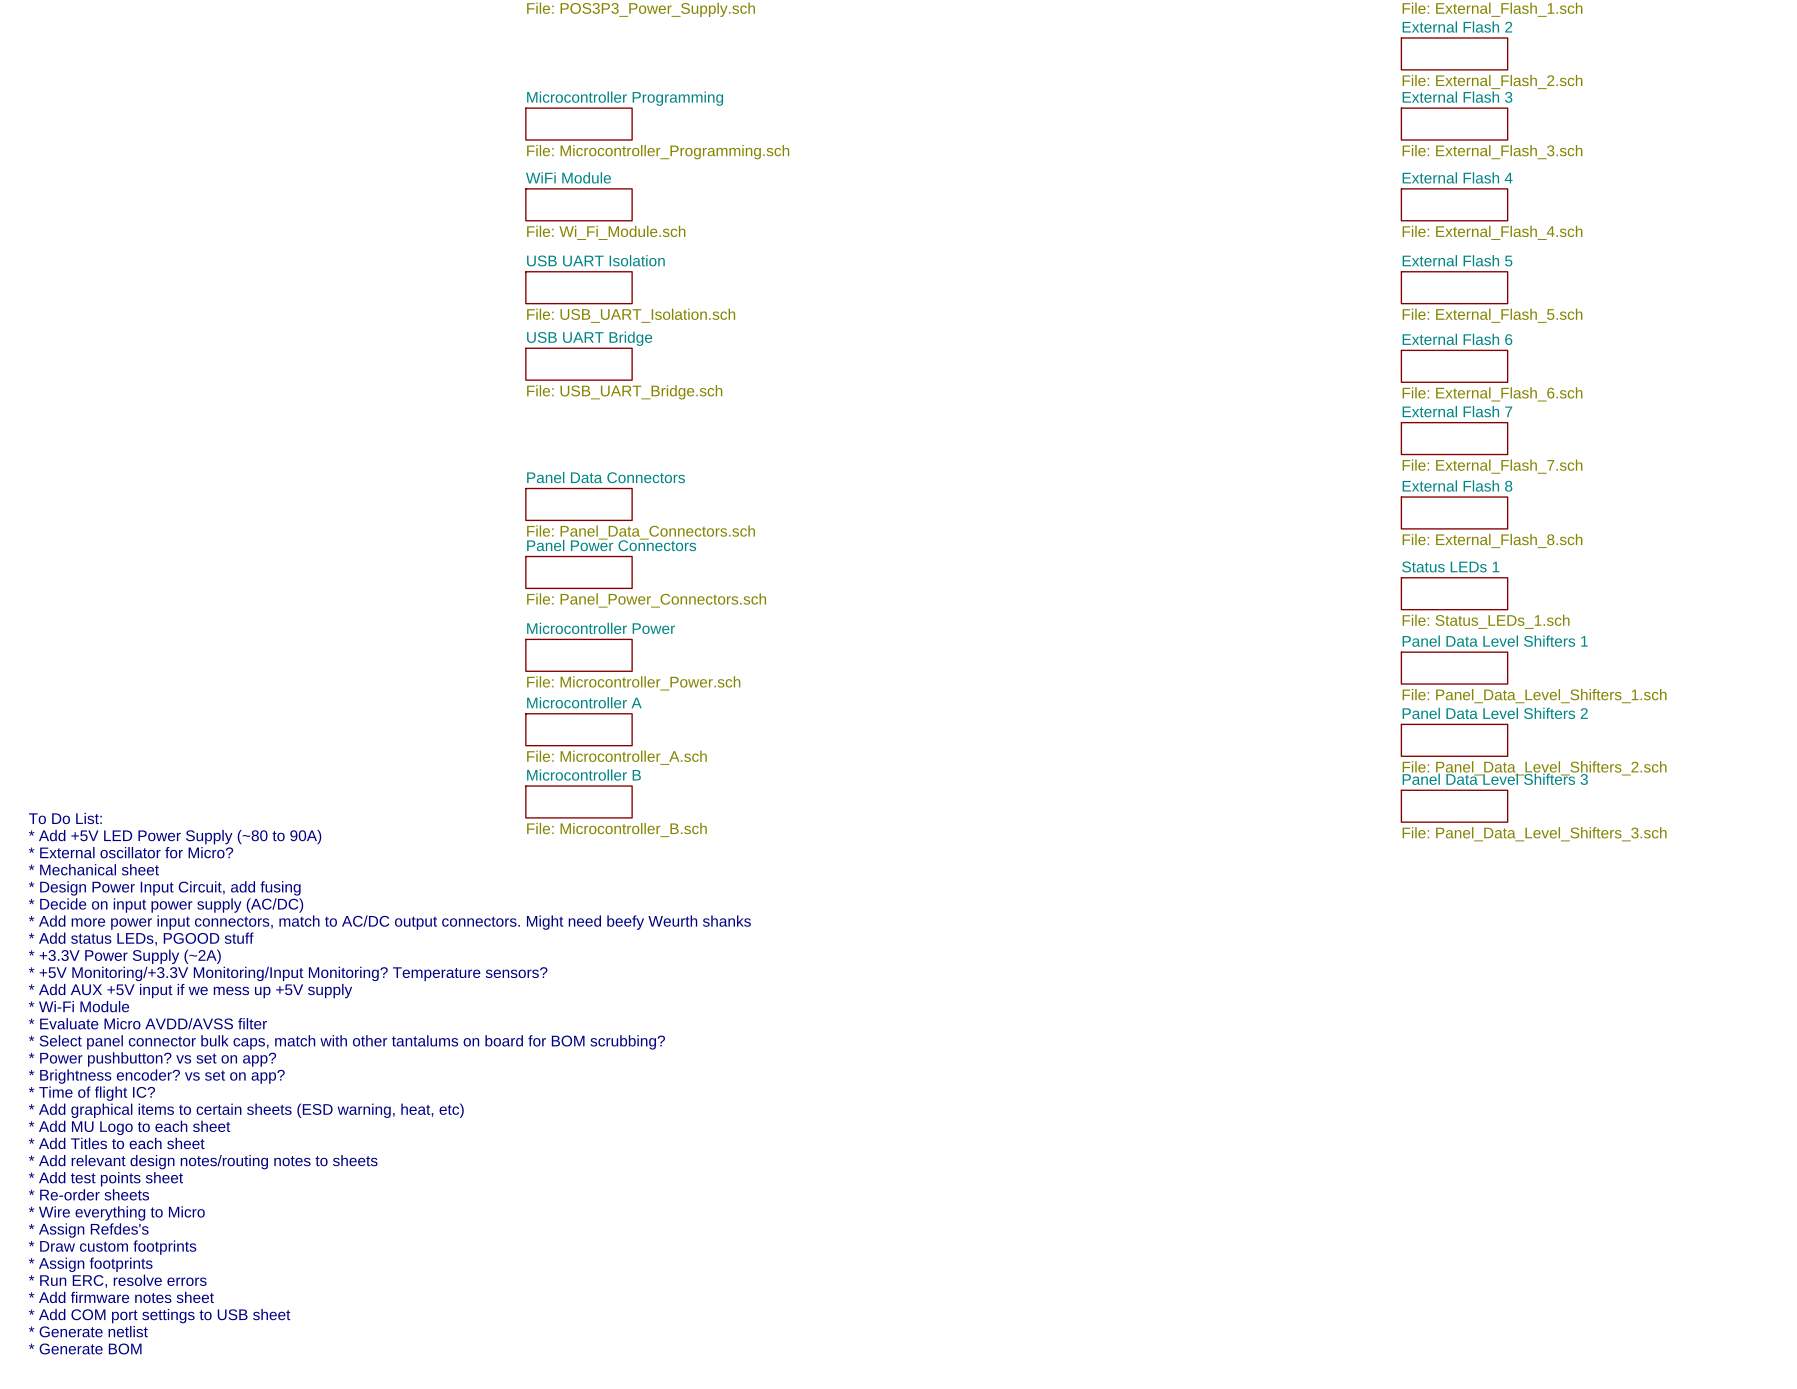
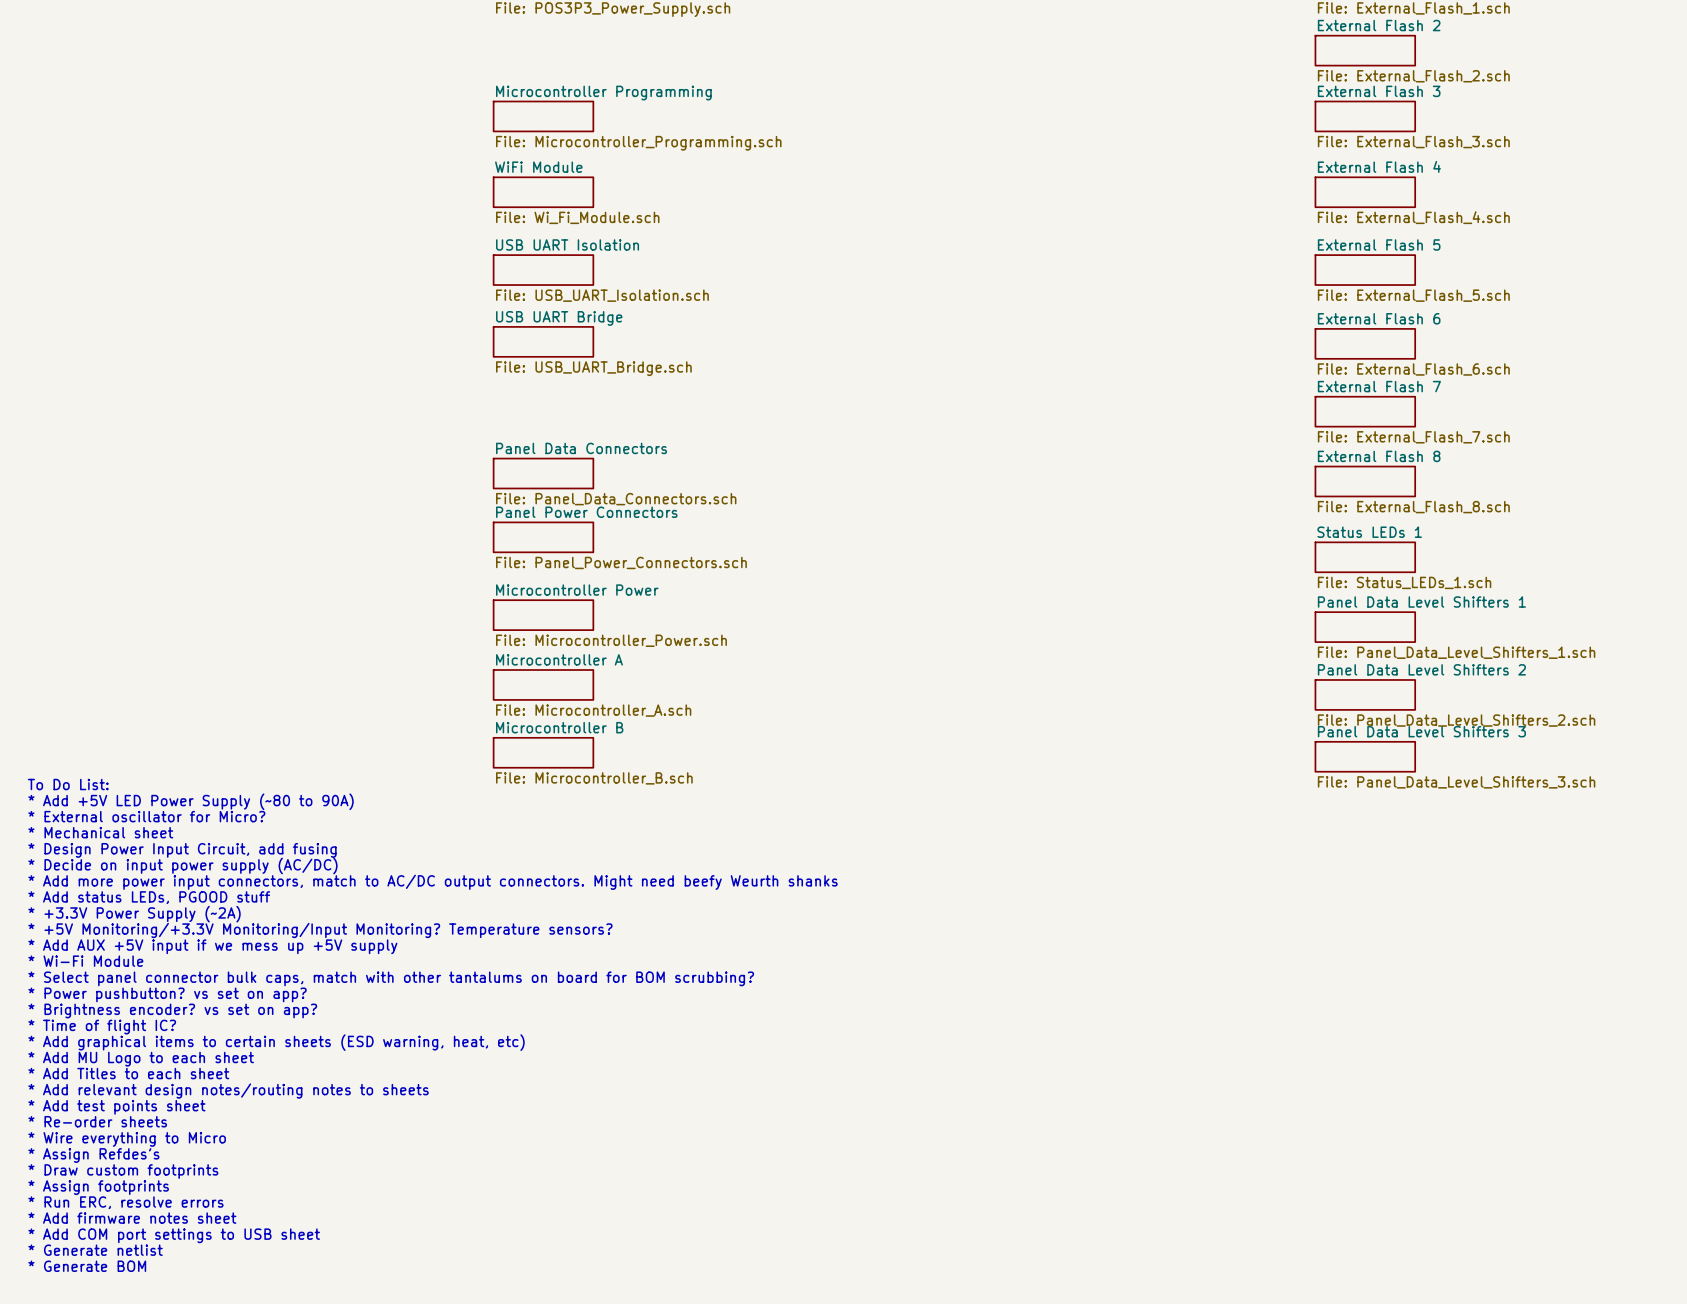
text: To Do List: (65, 818) -> none
text: * Add +5V LED Power Supply (~80 to 90A) (175, 837) -> To Do List: (68, 784)
text: * External oscillator for Micro? (131, 852) -> * Add +5V LED Power Supply (~80 to 90A) (191, 801)
text: * Mechanical sheet (93, 869) -> * External oscillator for Micro? (146, 816)
text: * Design Power Input Circuit, add fusing (164, 888) -> * Mechanical sheet (100, 832)
text: * Decide on input power supply (AC/DC) (166, 905) -> * Design Power Input Circuit, add fusing (182, 850)
text: * Add more power input connectors, match to AC/DC output connectors. Might need beefy Weurth shanks (389, 922) -> * Decide on input power supply (AC/DC) (182, 865)
text: * Add status LEDs, PGOOD stuff (141, 939) -> * Add more power input connectors, match to AC/DC output connectors. Might need beefy Weurth shanks (432, 882)
text: * +3.3V Power Supply (~2A) (124, 956) -> * Add status LEDs, PGOOD stuff (149, 897)
text: * +5V Monitoring/+3.3V Monitoring/Input Monitoring? Temperature sensors? (288, 973) -> * +3.3V Power Supply (~2A) (134, 914)
text: * Add AUX +5V input if we mess up +5V supply (190, 991) -> * +5V Monitoring/+3.3V Monitoring/Input Monitoring? Temperature sensors? (320, 930)
text: * Wi-Fi Module (79, 1006) -> * Add AUX +5V input if we mess up +5V supply (212, 946)
text: * Evaluate Micro AVDD/AVSS filter (147, 1023) -> * Wi-Fi Module (85, 961)

